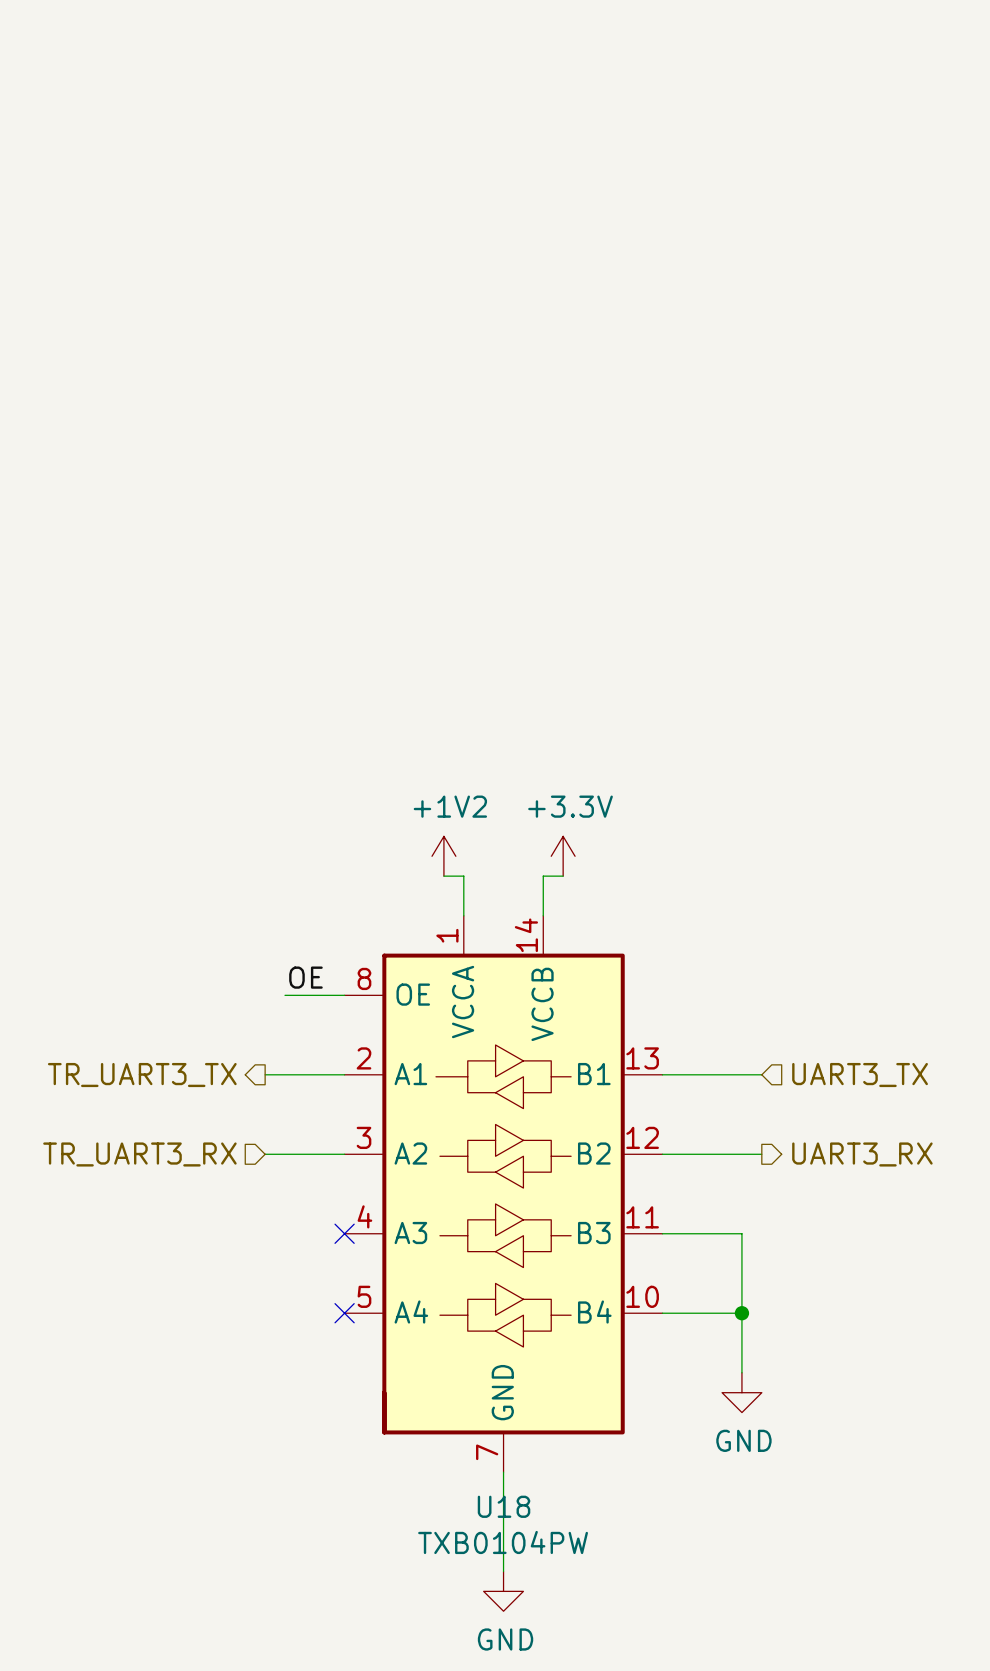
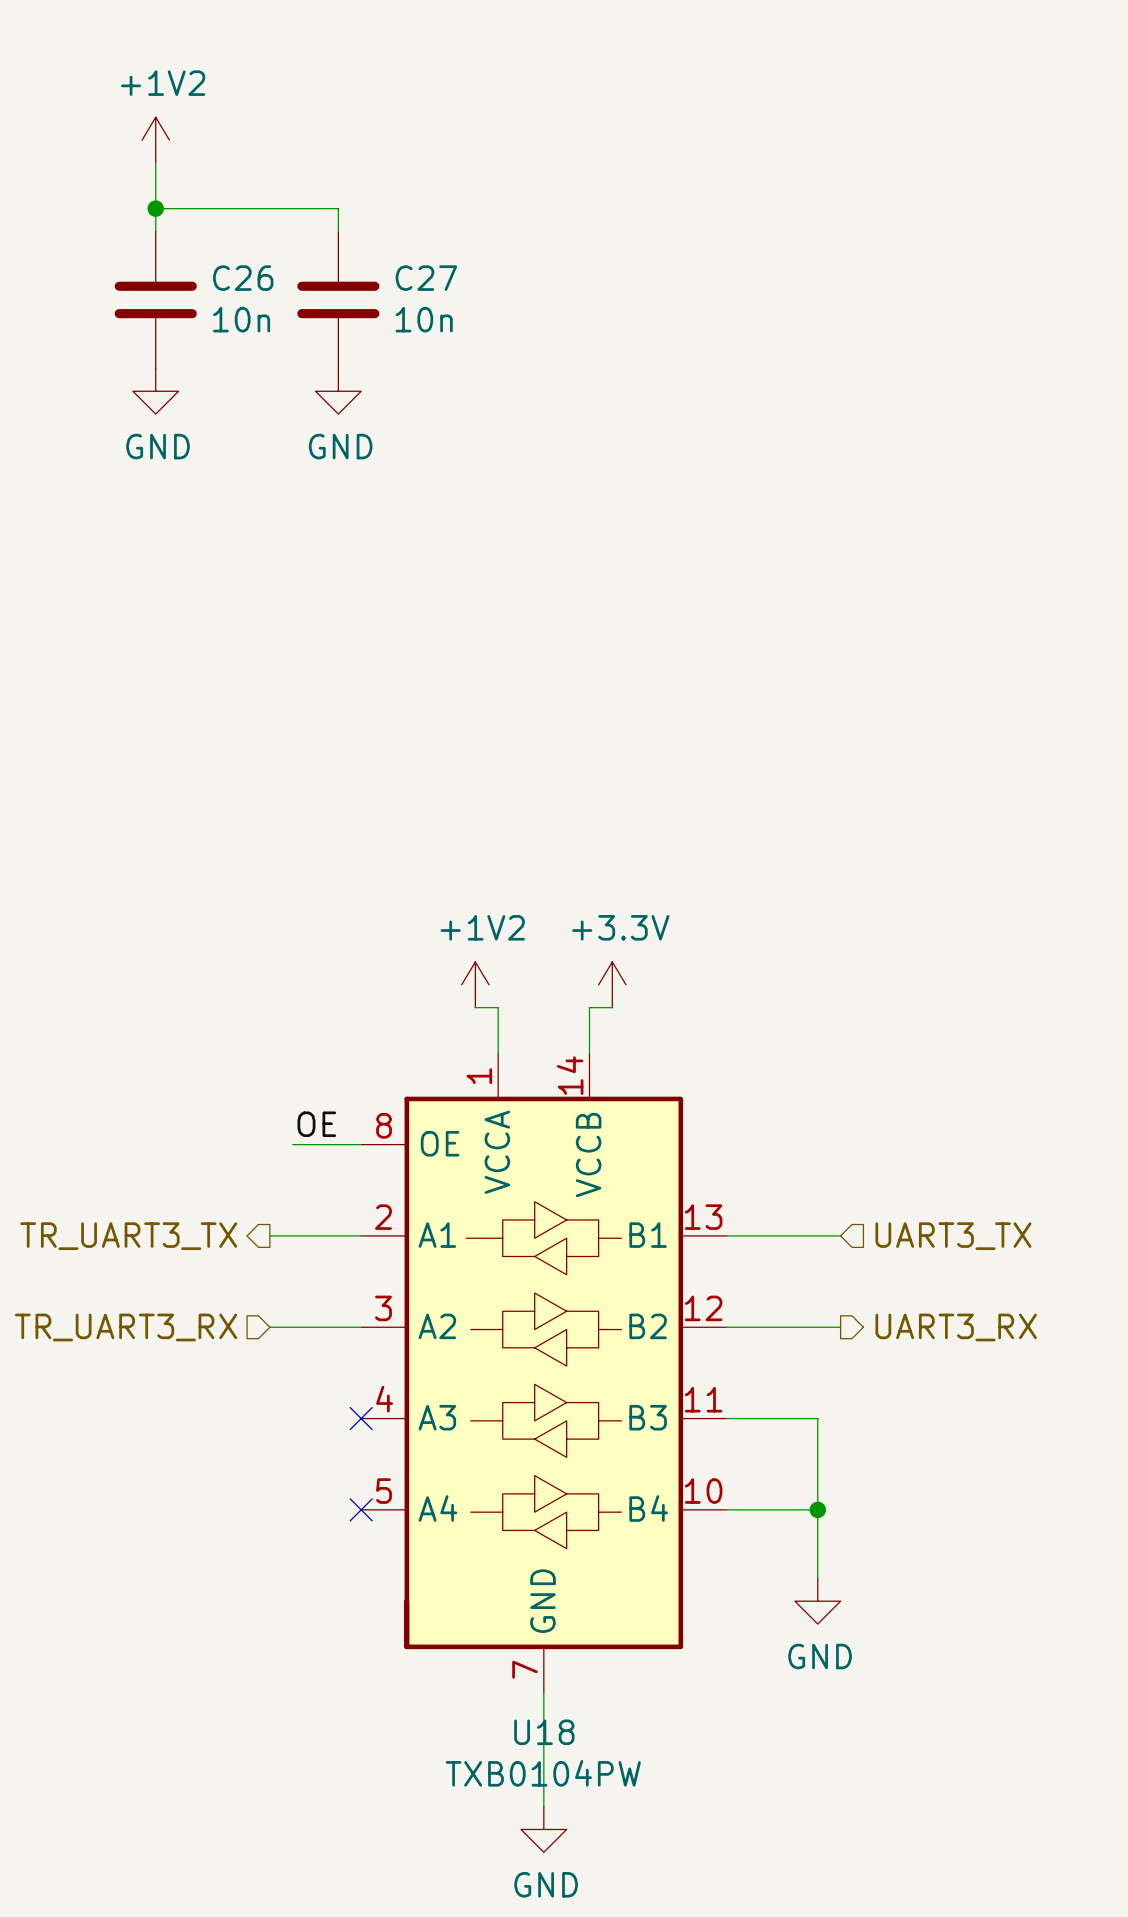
power symbol: none -> +1V2 (155, 140)
wire: none -> (155, 162) (155, 231)
wire: none -> (155, 208) (338, 208) (338, 231)
junction: none -> (155, 208)
C26: none -> 10n (155, 299)
C27: none -> 10n (338, 299)
power symbol: none -> GND (155, 391)
power symbol: none -> GND (338, 391)

